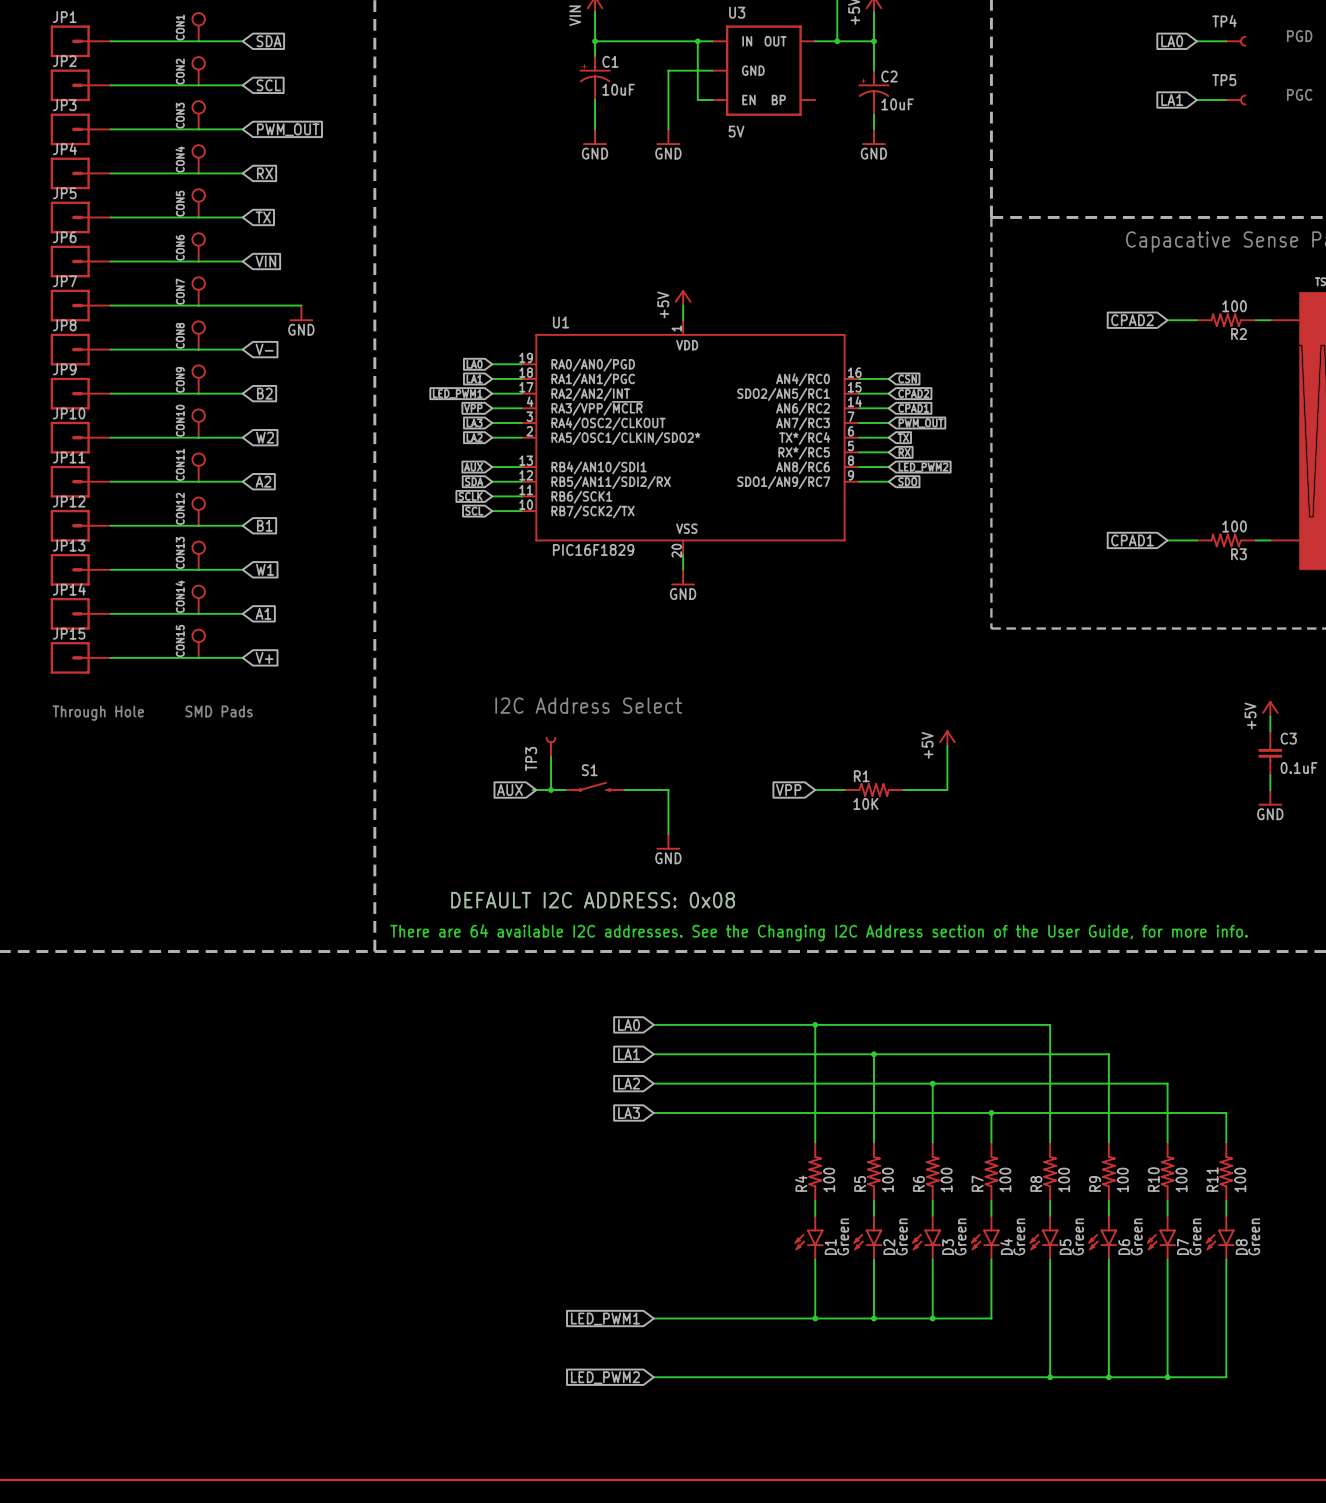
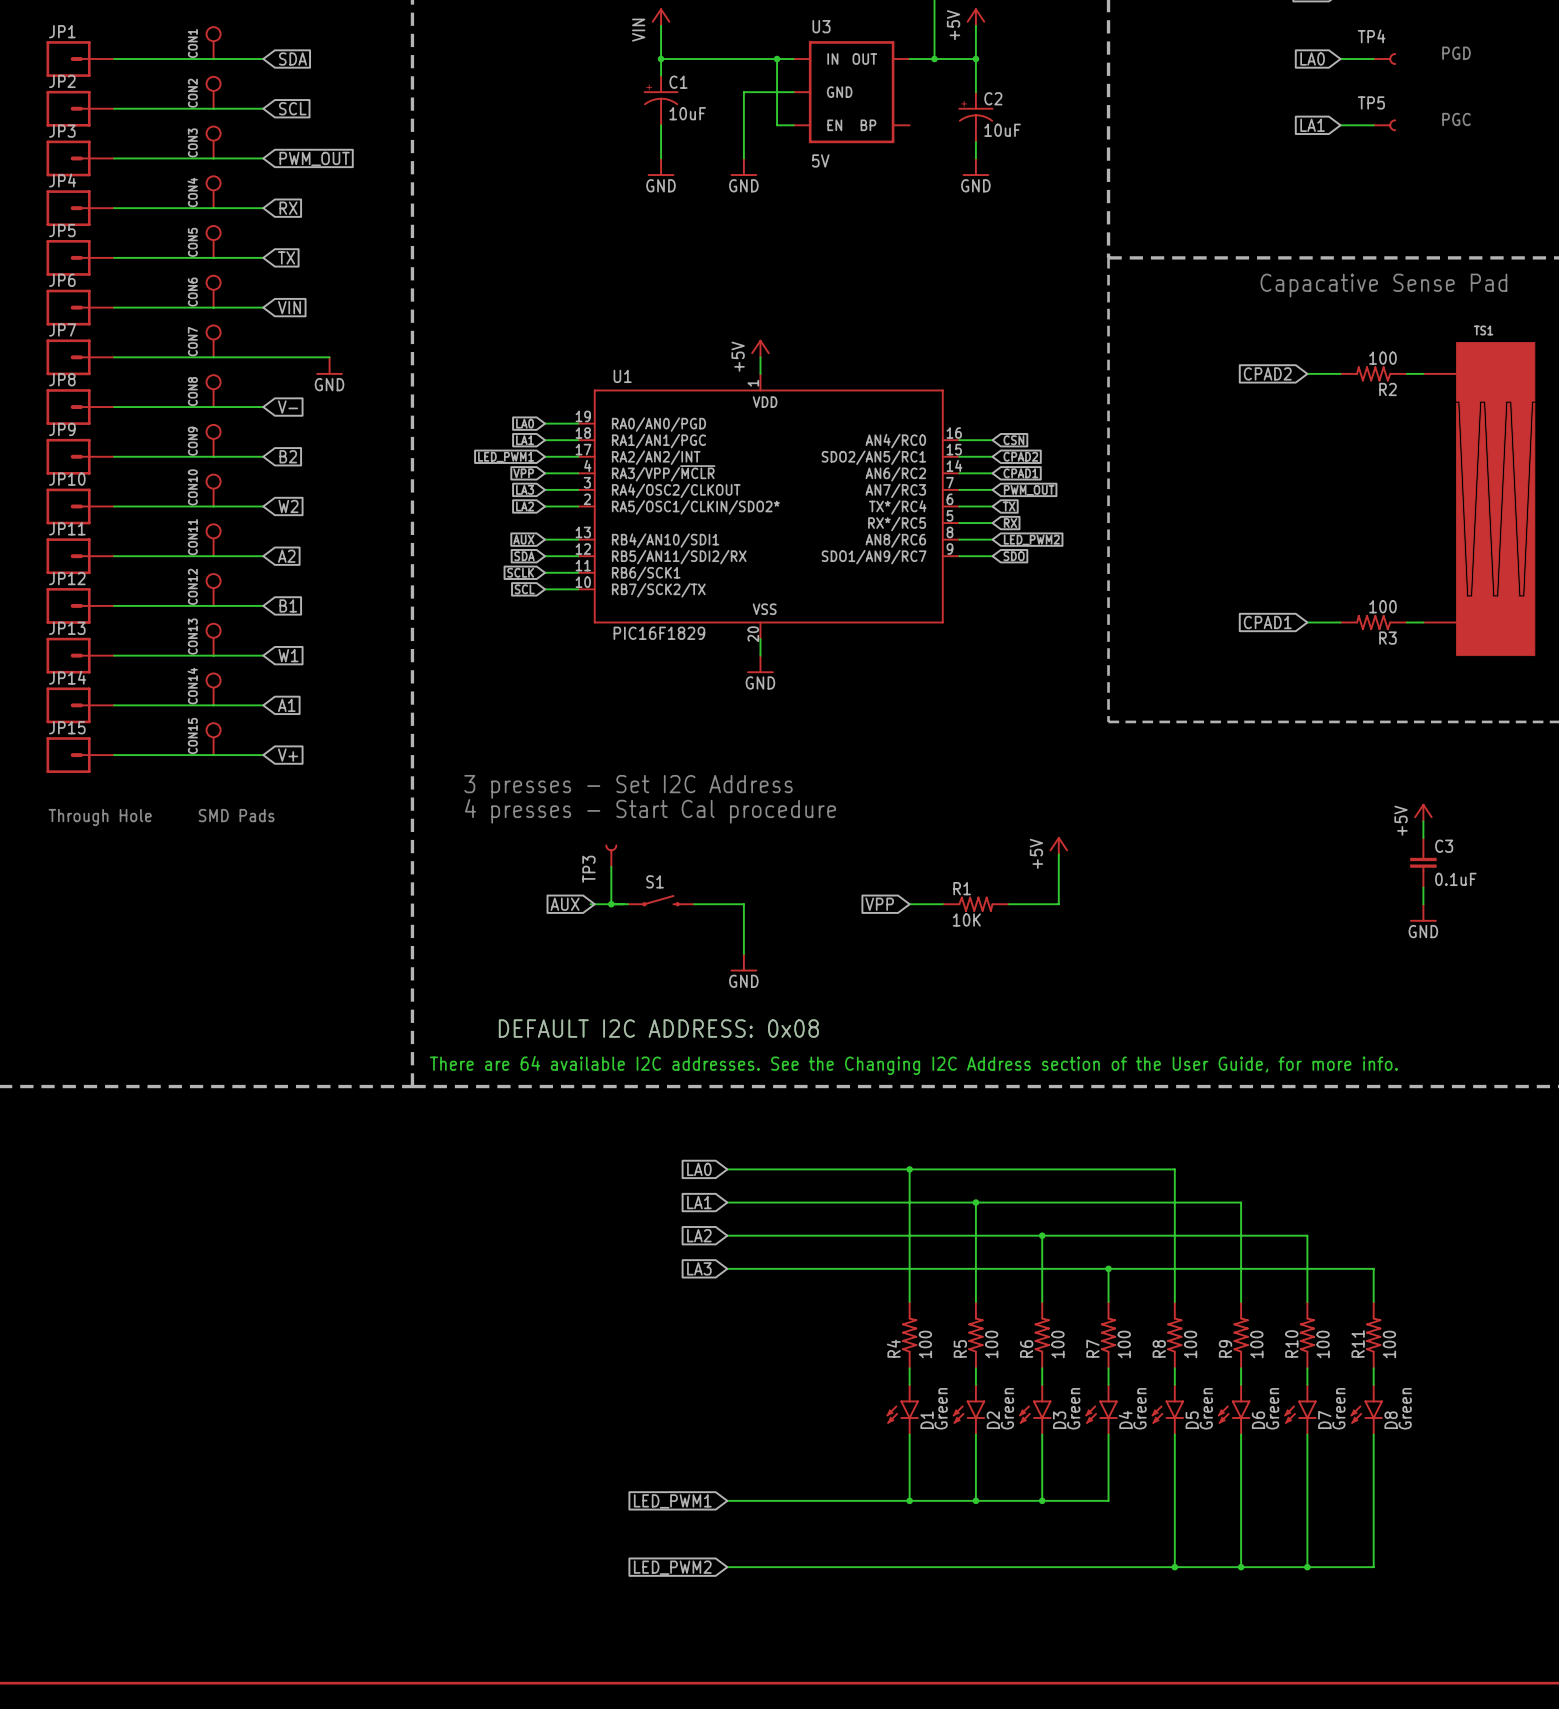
text: none -> 3 presses - Set I2C Address (628, 786)
text: I2C Address Select (588, 705) -> none
text: none -> 4 presses - Start Cal procedure (650, 811)

